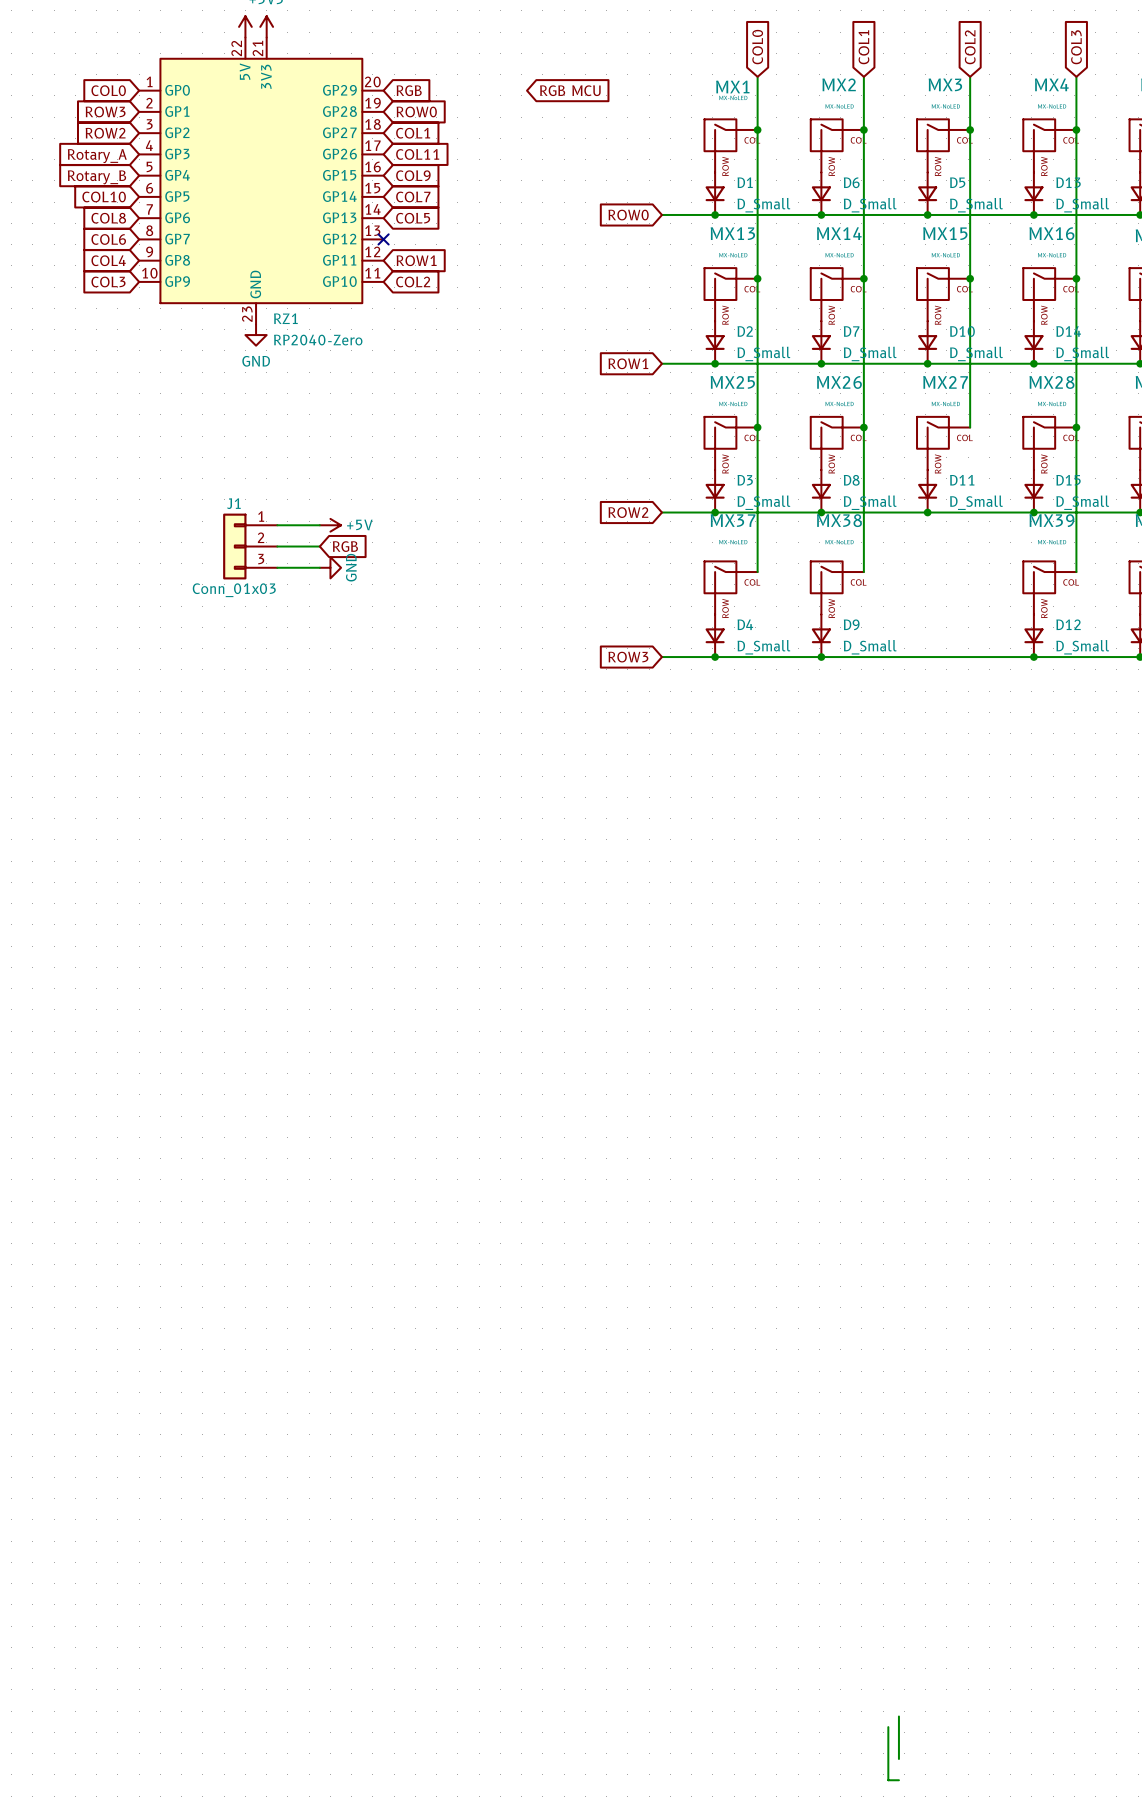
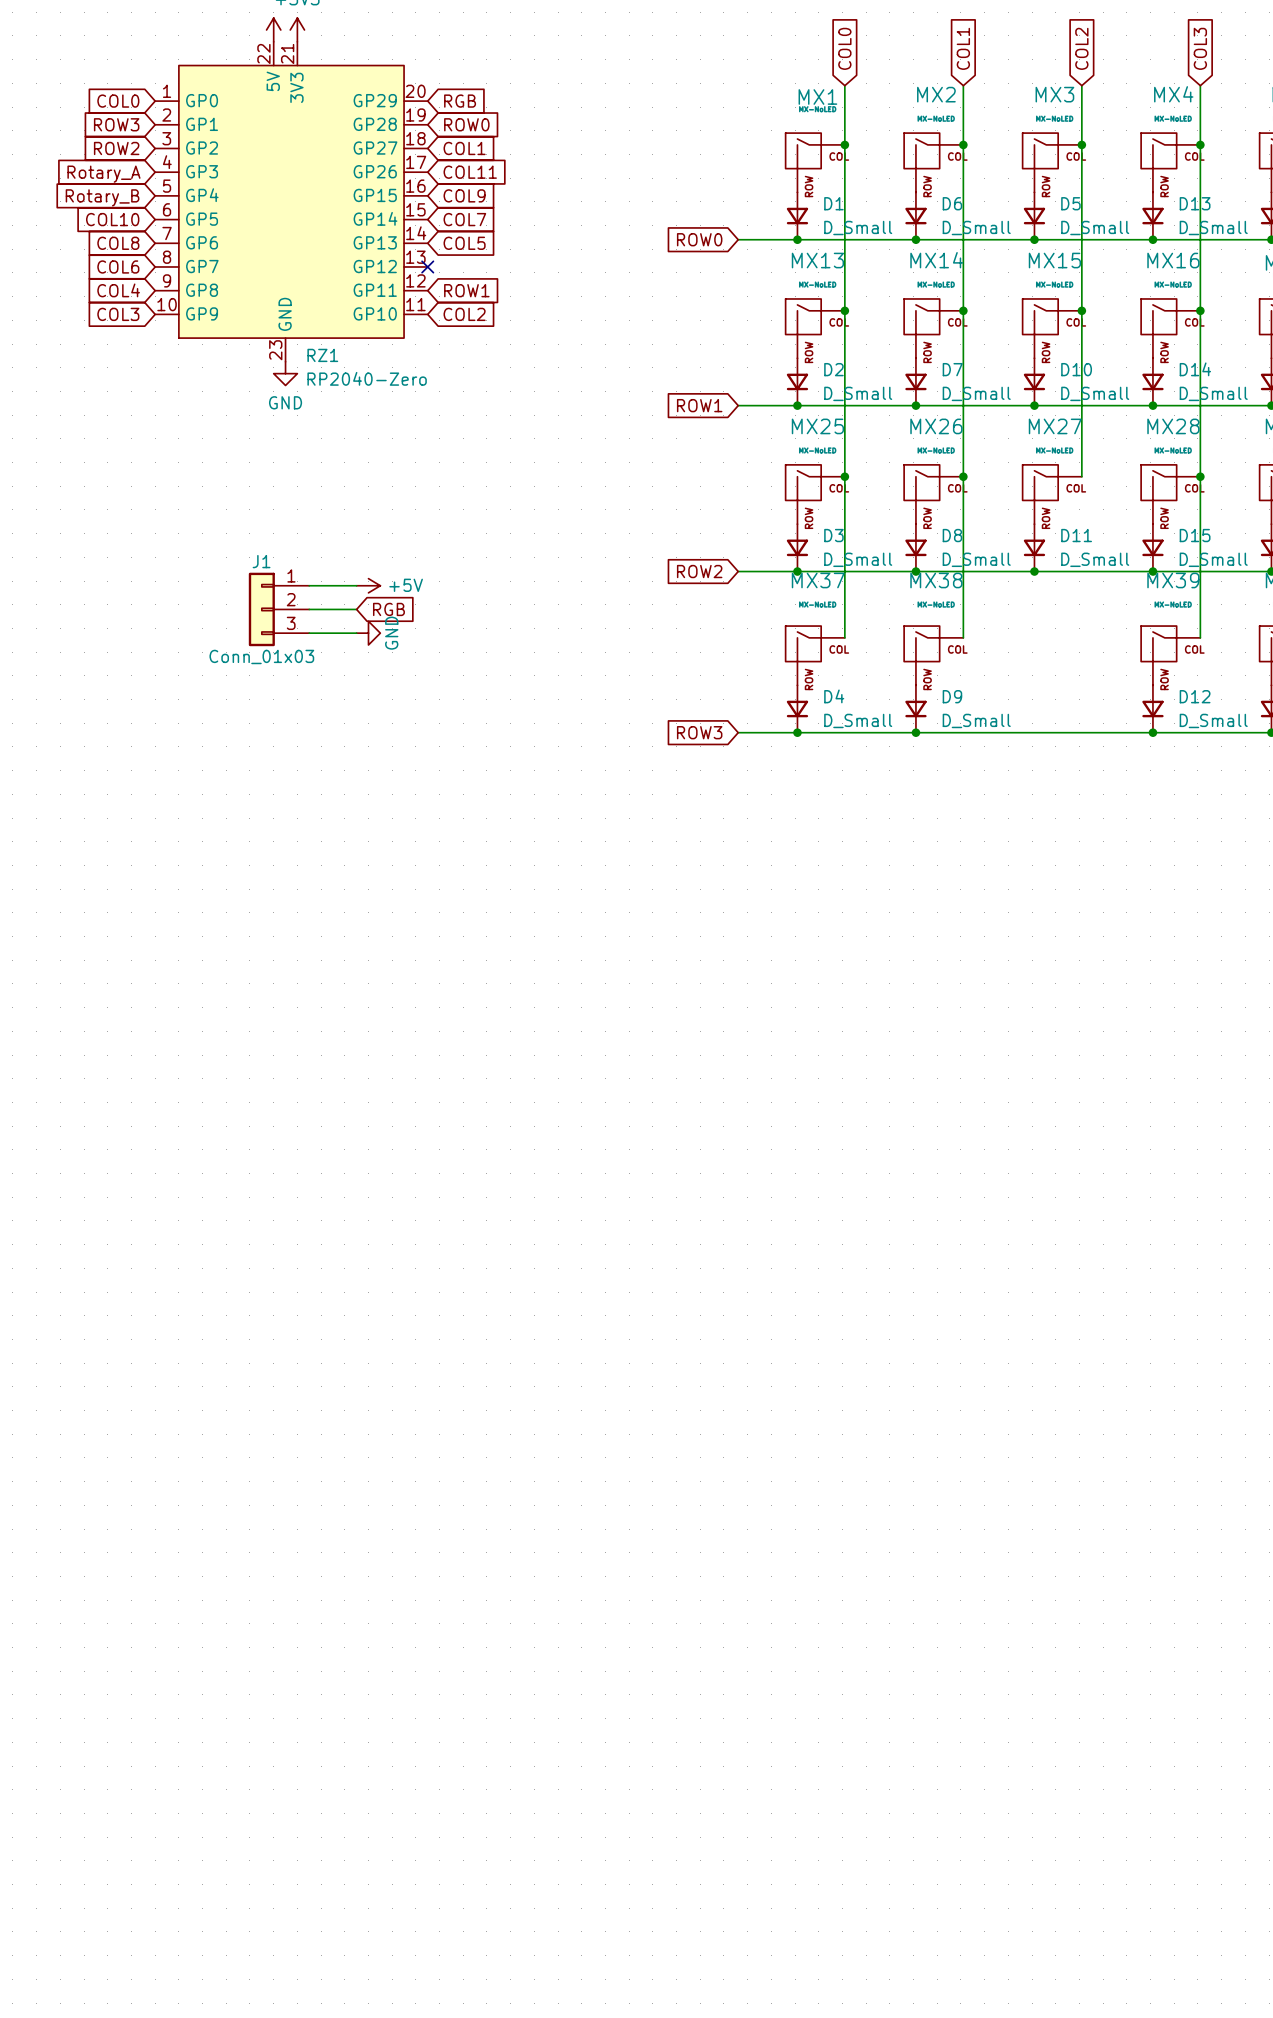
global label: RGB MCU (570, 90) -> none
wire: (898, 1716) (898, 1758) -> none
wire: (888, 1727) (888, 1780) (898, 1780) -> none

